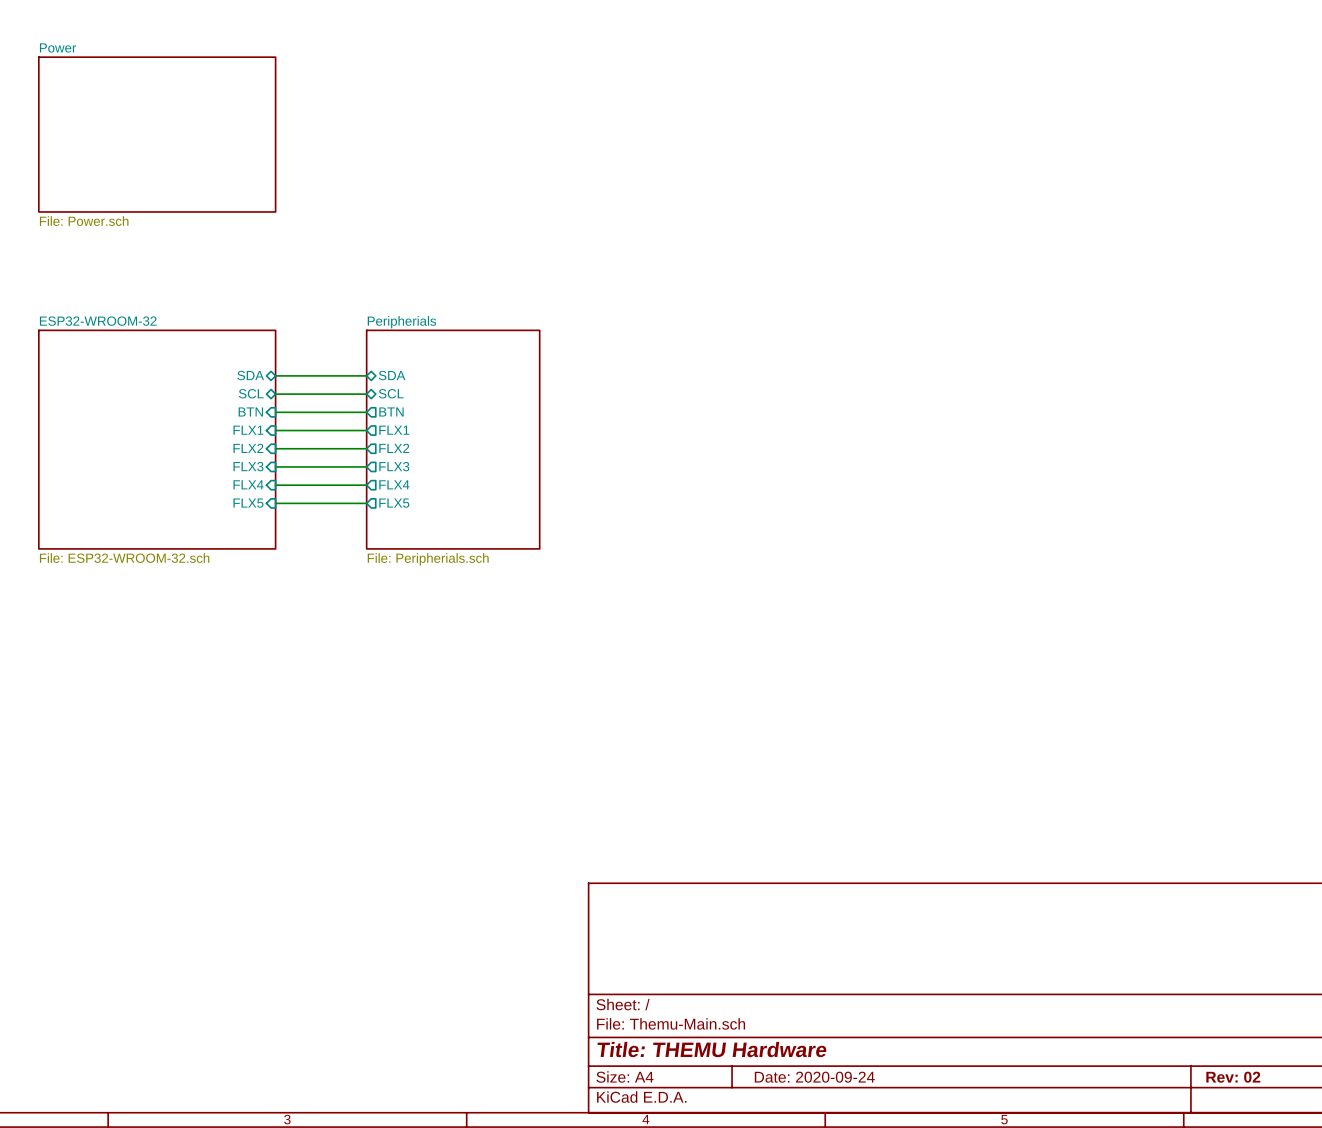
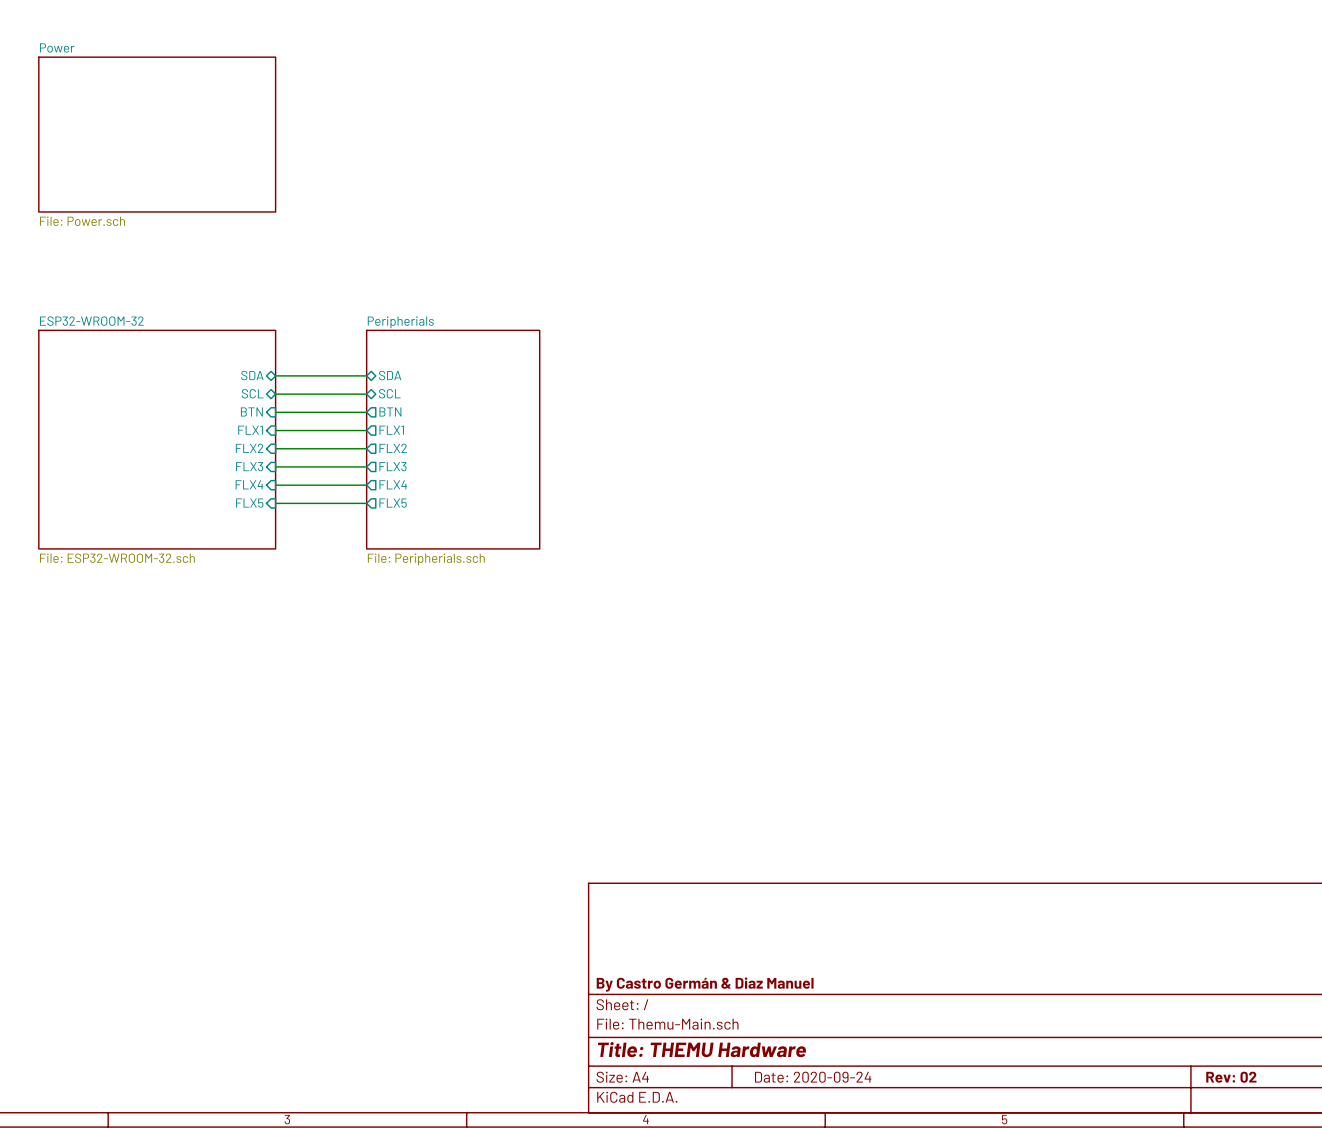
title block: none -> By Castro Germán & Diaz Manuel (705, 984)

